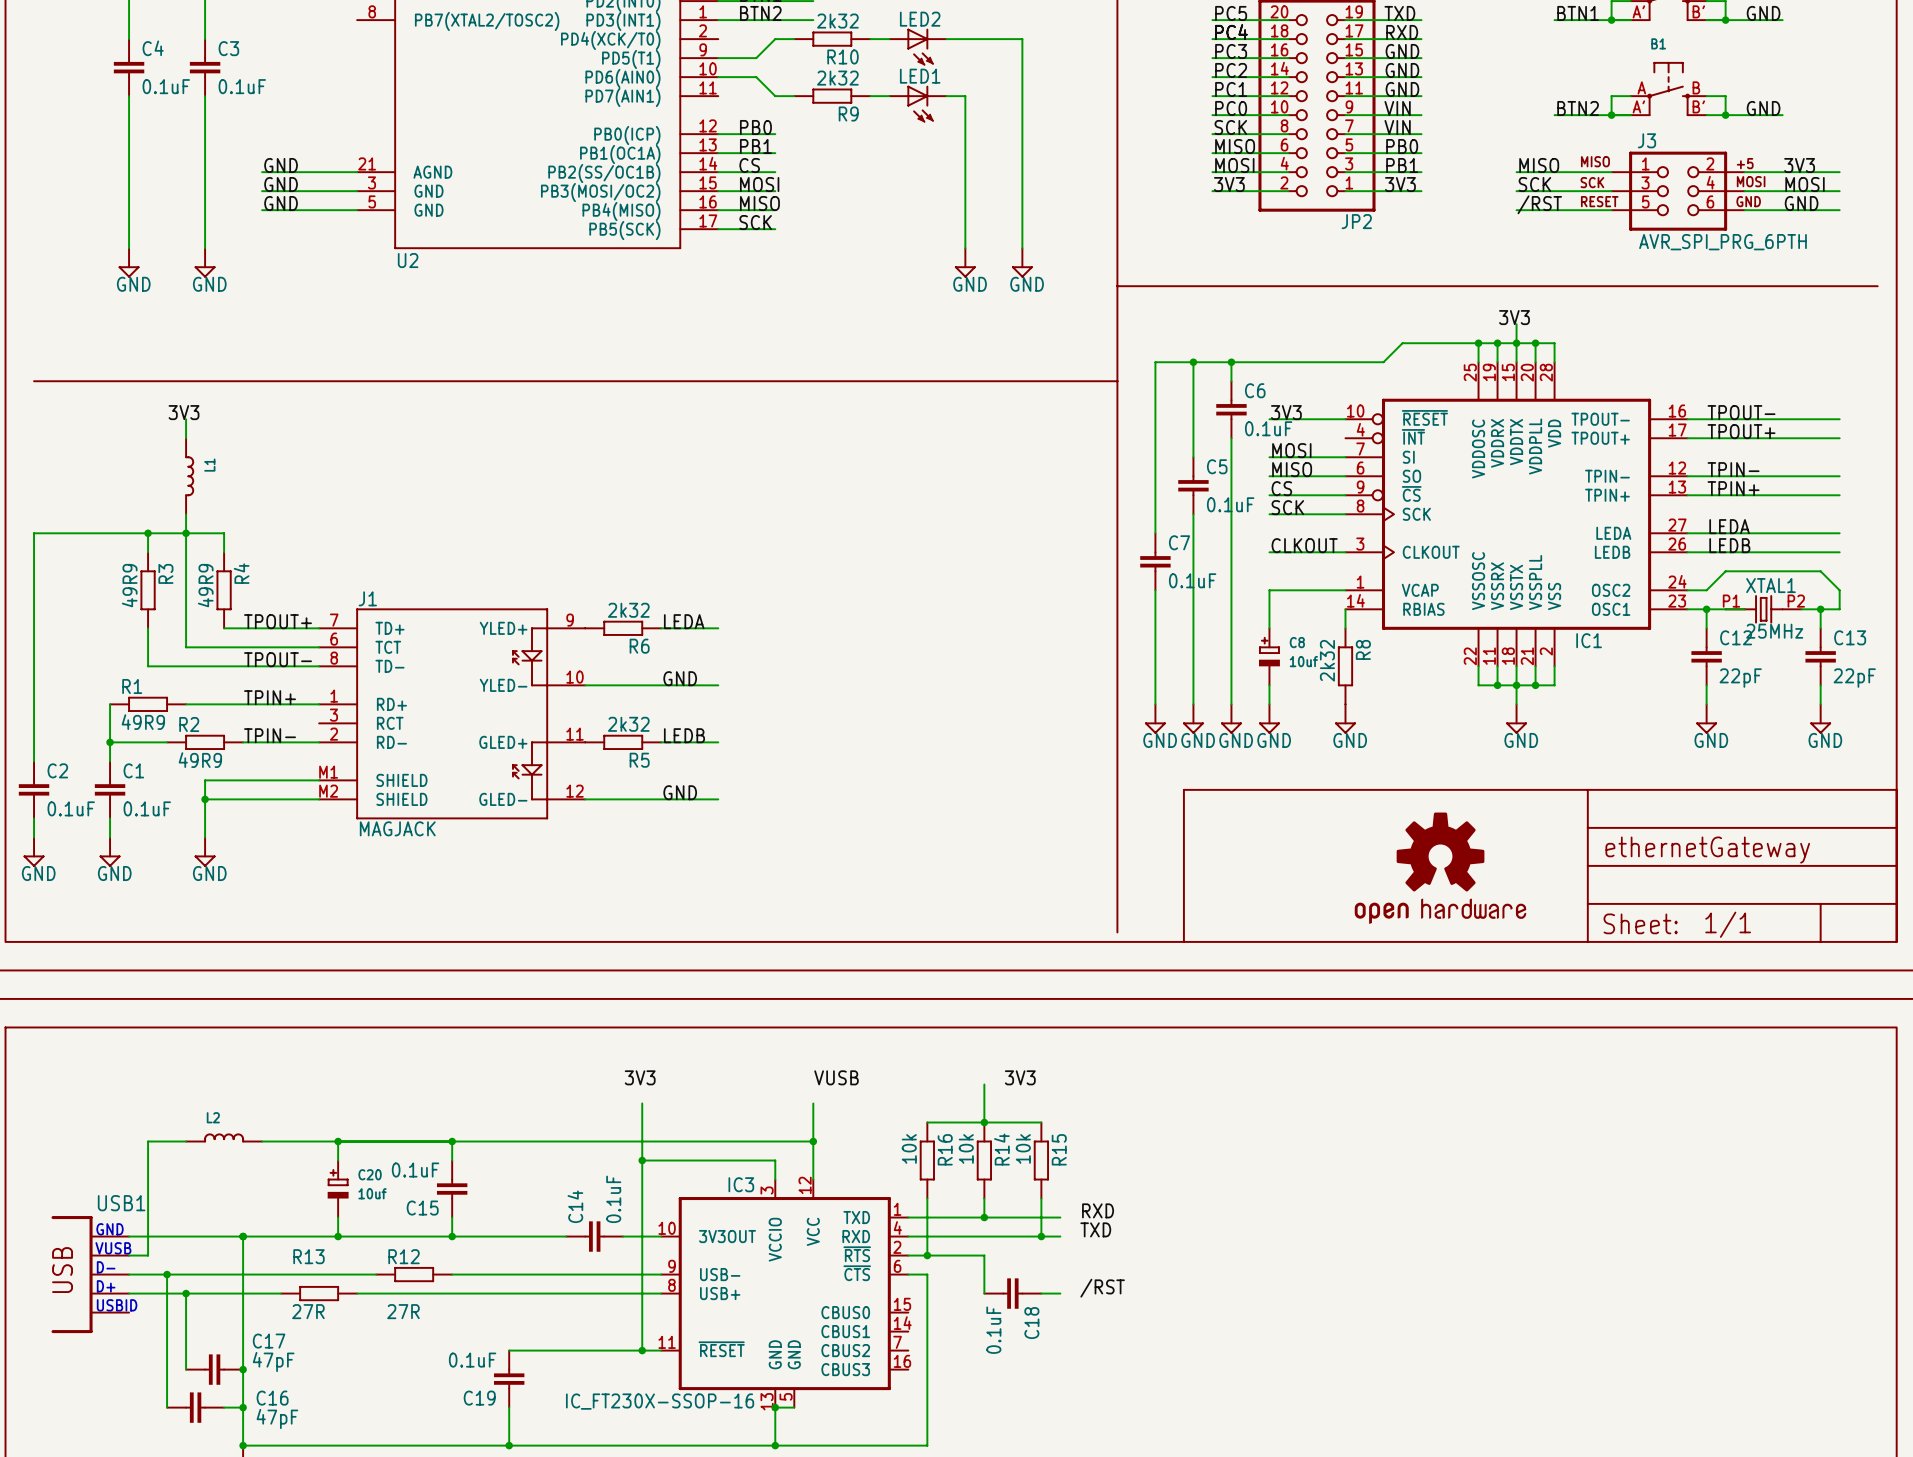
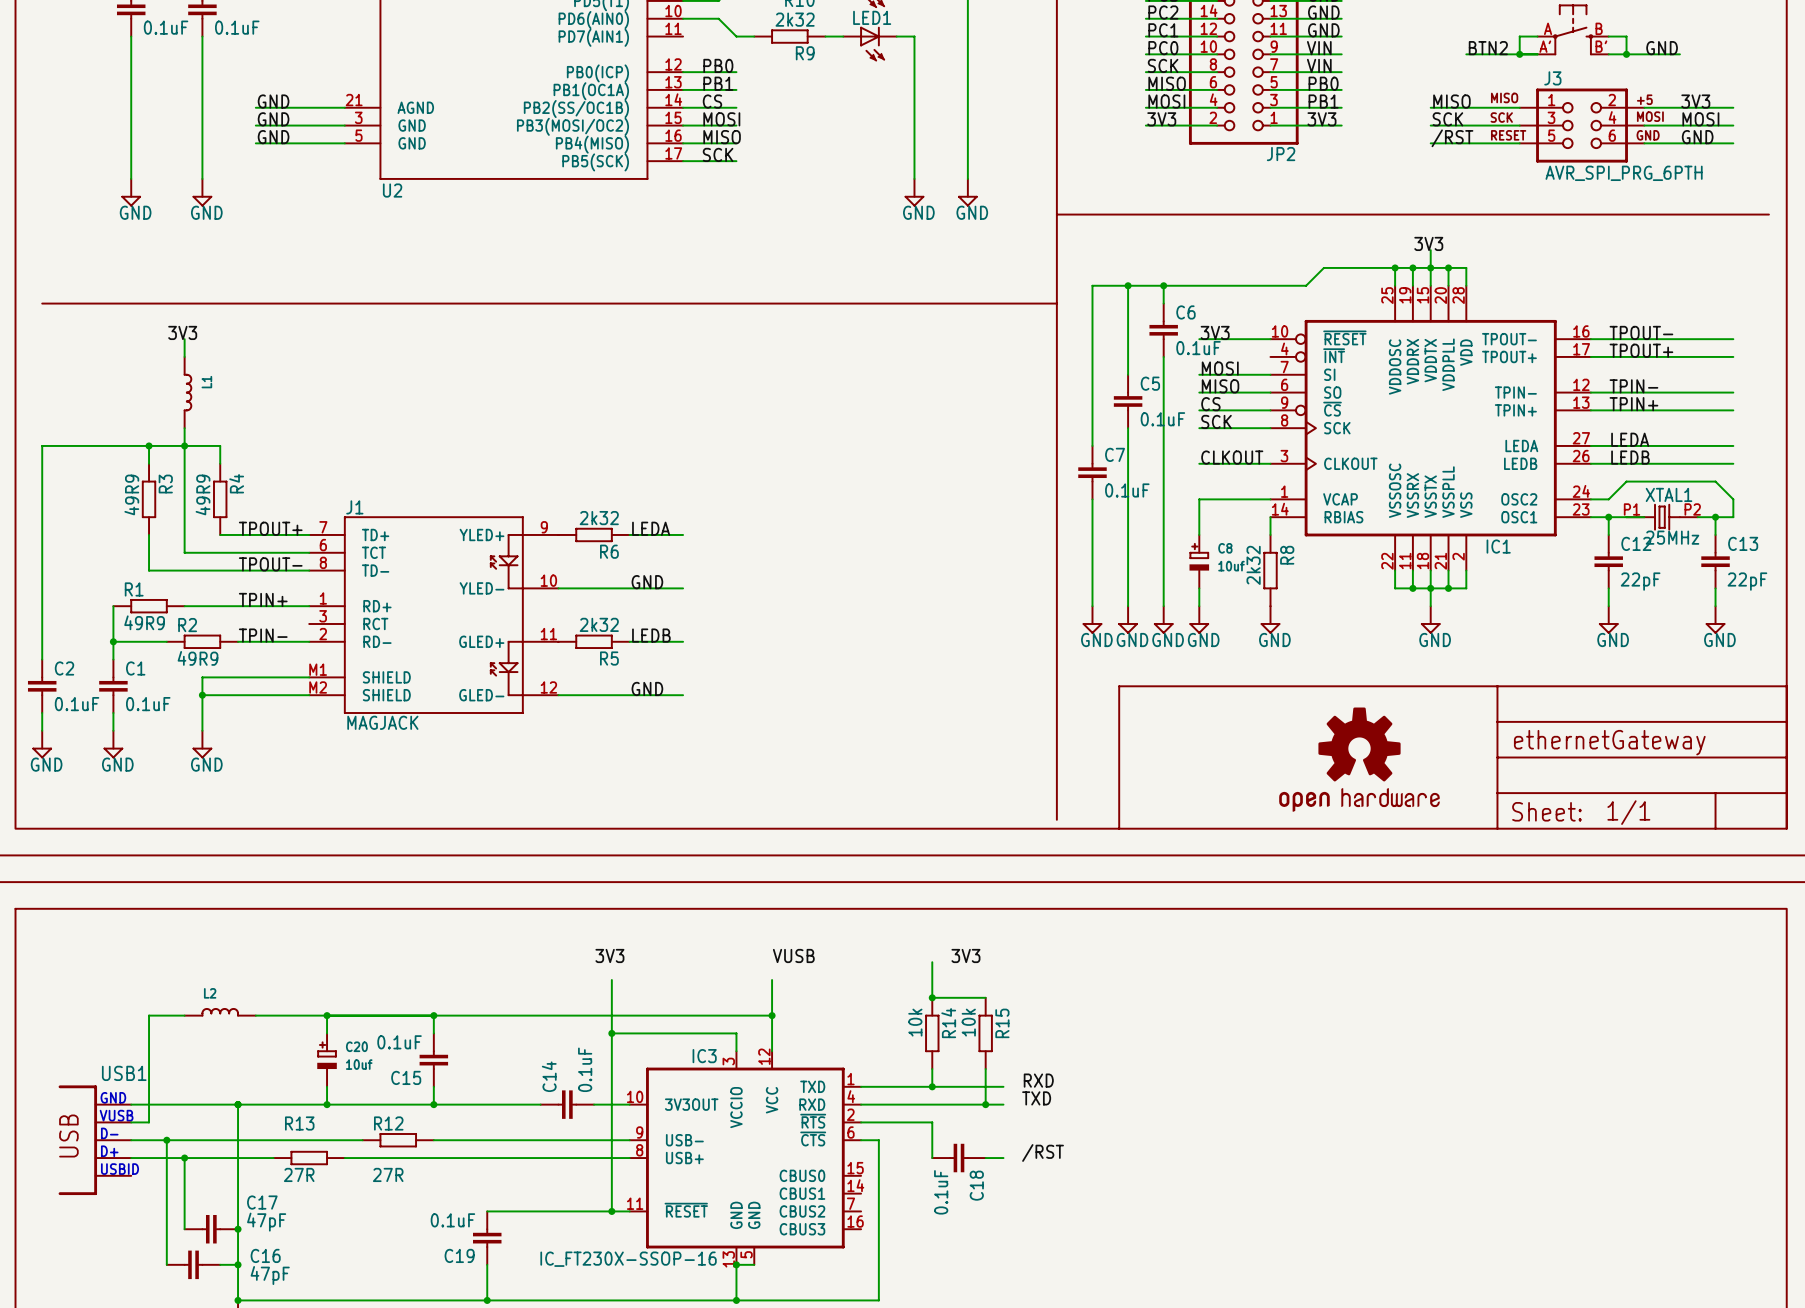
wire: (927, 1122) (984, 1122) -> none
R16: 10k (927, 1160) -> none
wire: (927, 1198) (927, 1255) -> none
junction: (927, 1255) -> none

